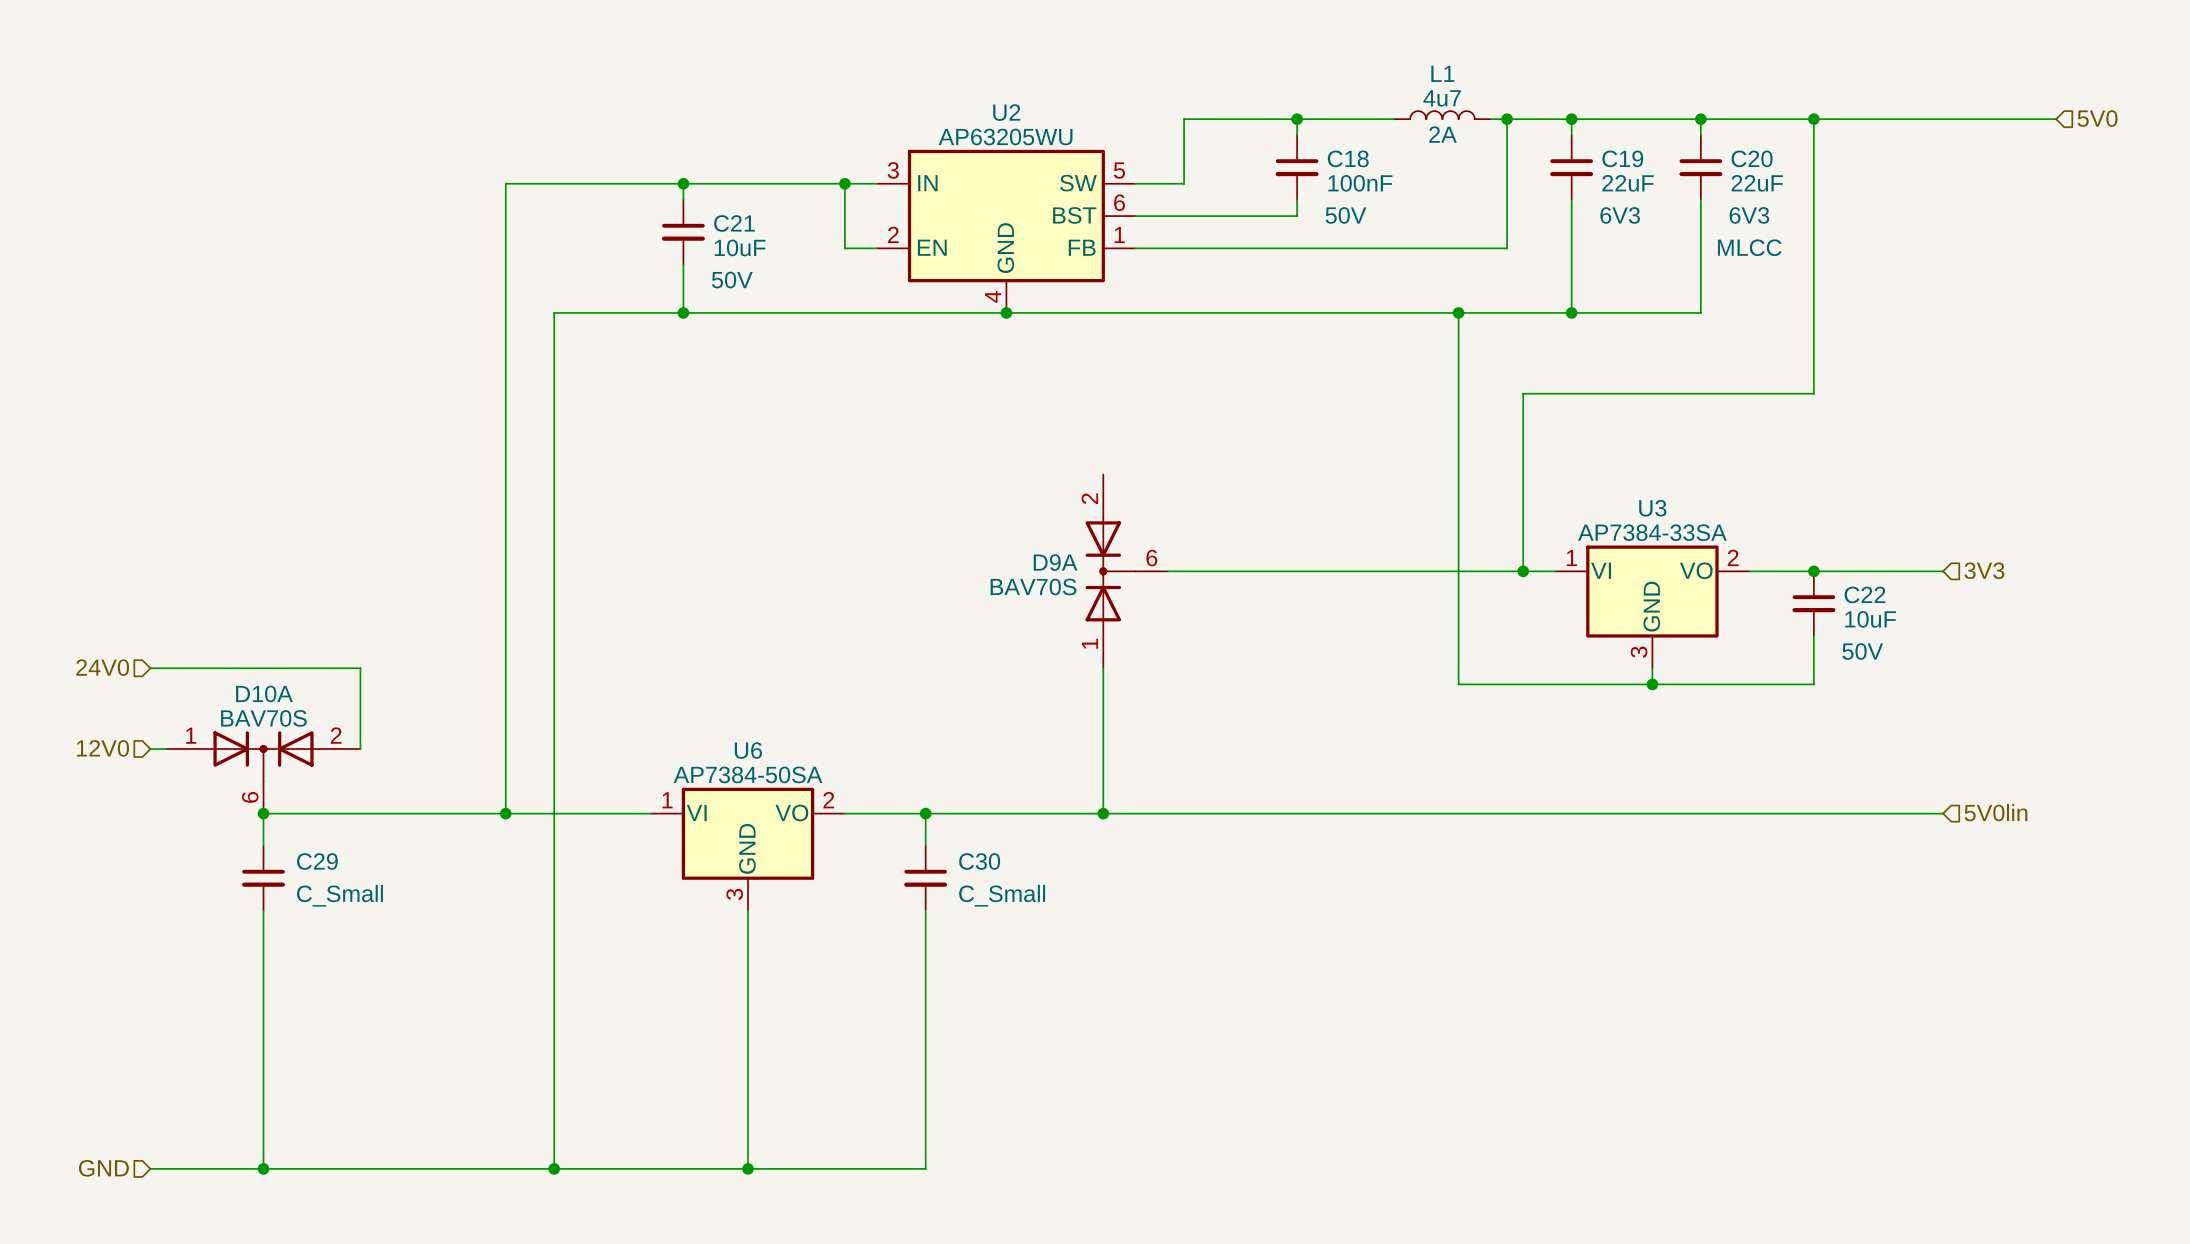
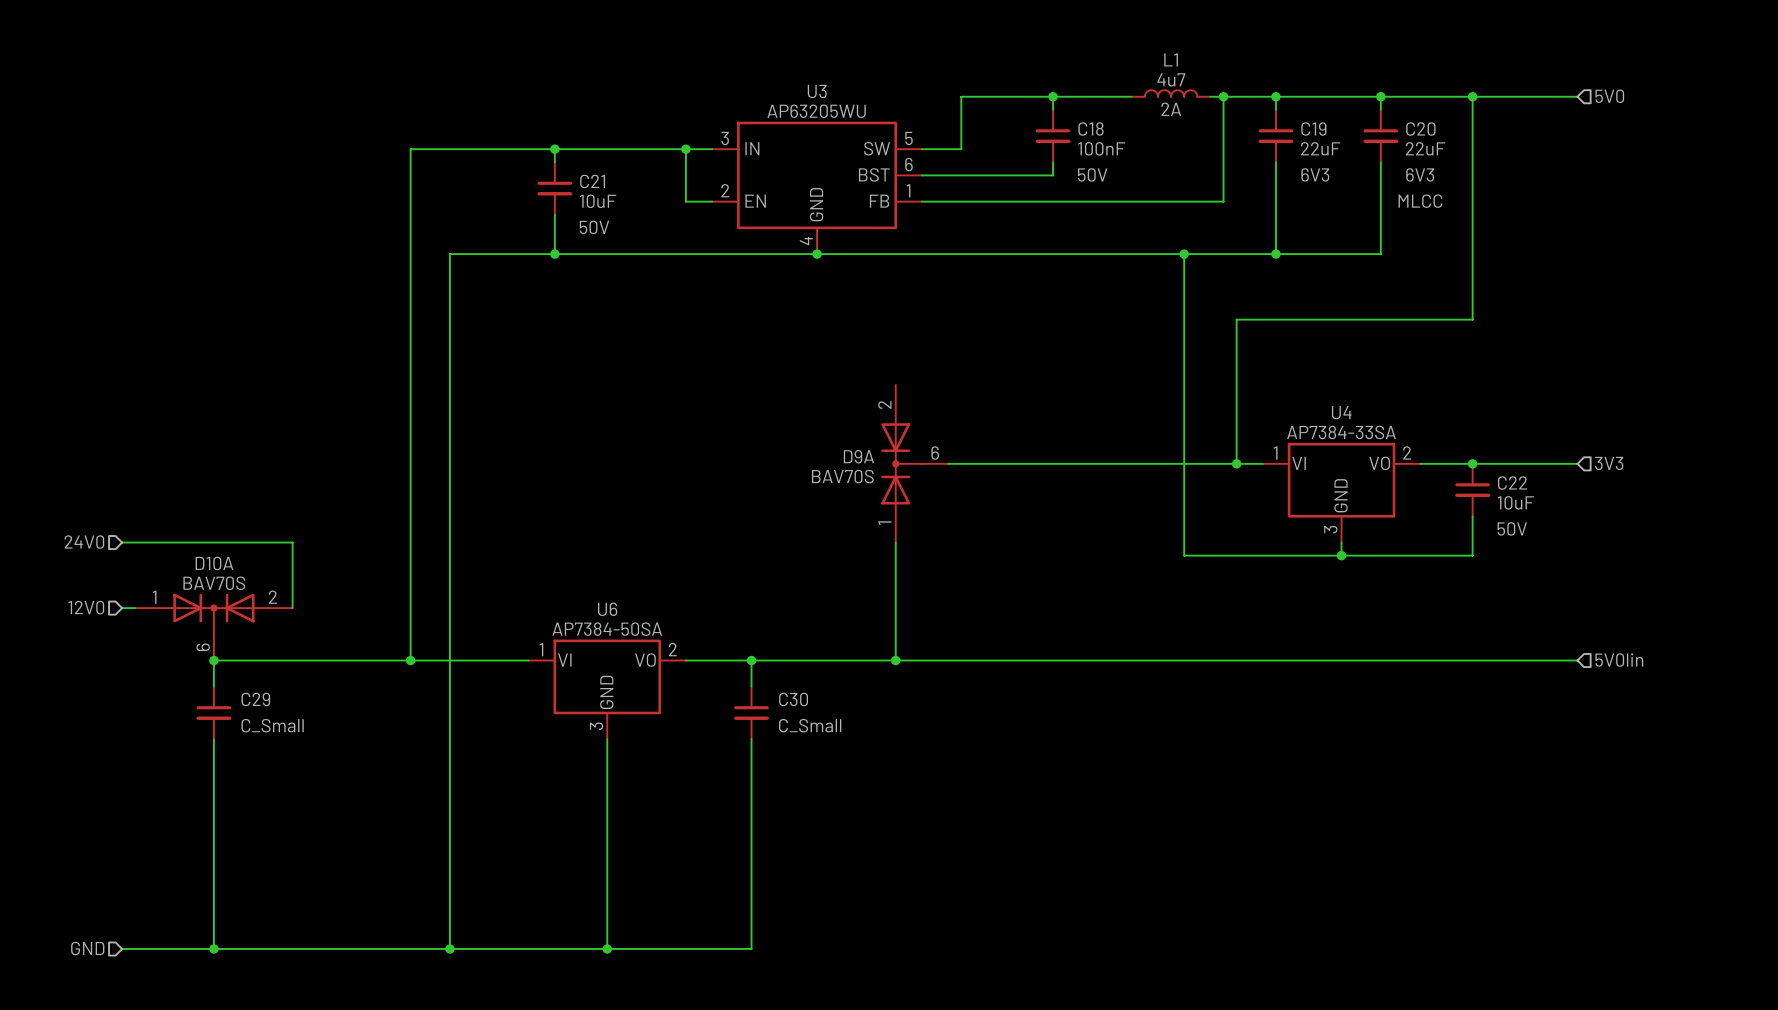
U2 name: U2 (1006, 112) -> U3 (817, 91)
hierarchical label position: 5V0 (2097, 118) -> 5V0 (1609, 96)
wire: (1943, 119) (2056, 119) -> none
U3 name: U3 (1652, 508) -> U4 (1341, 412)

